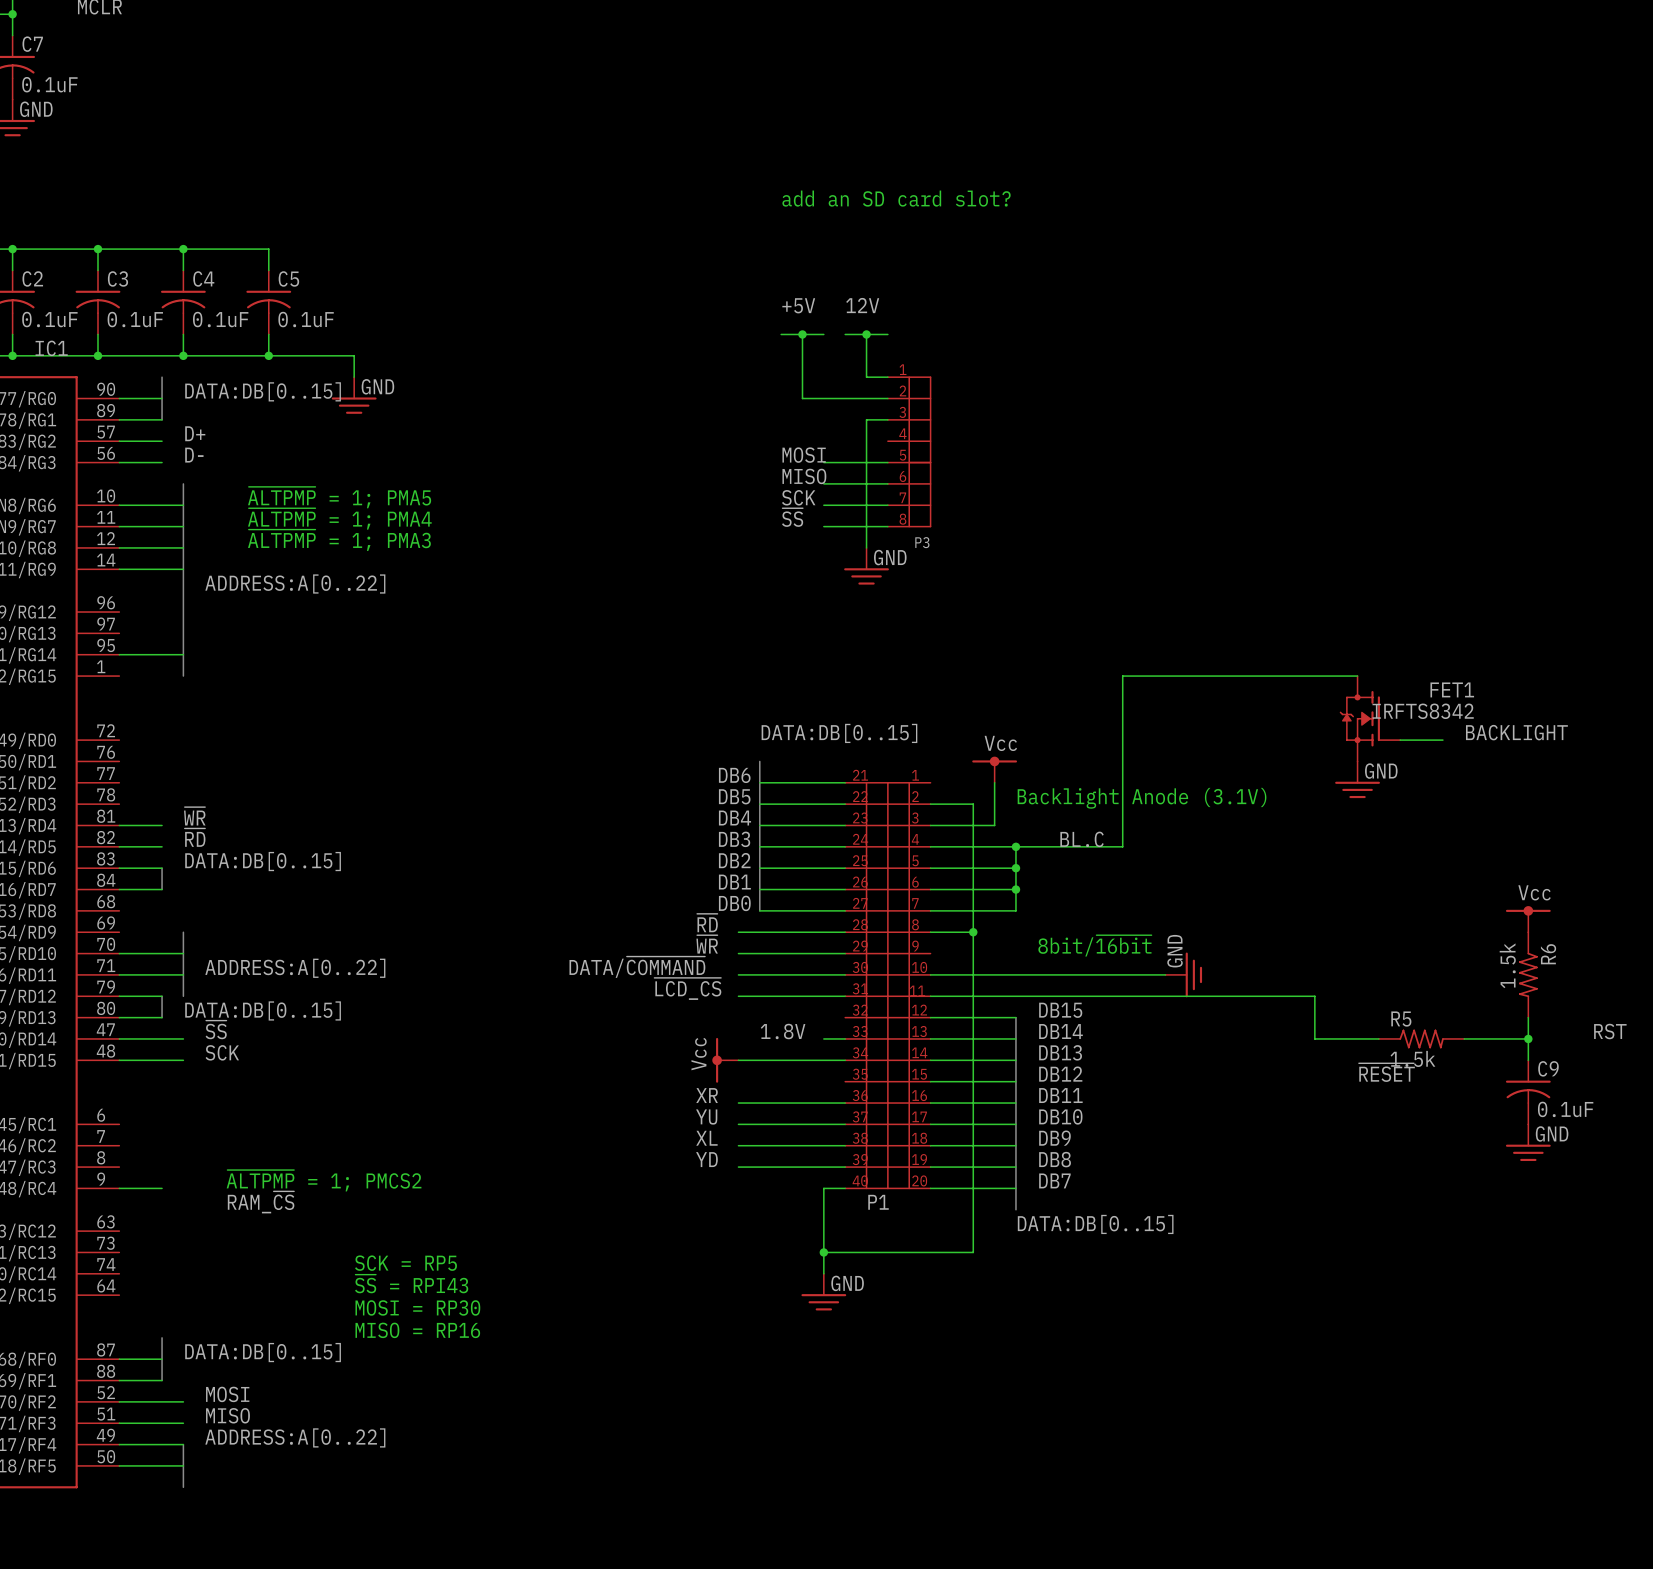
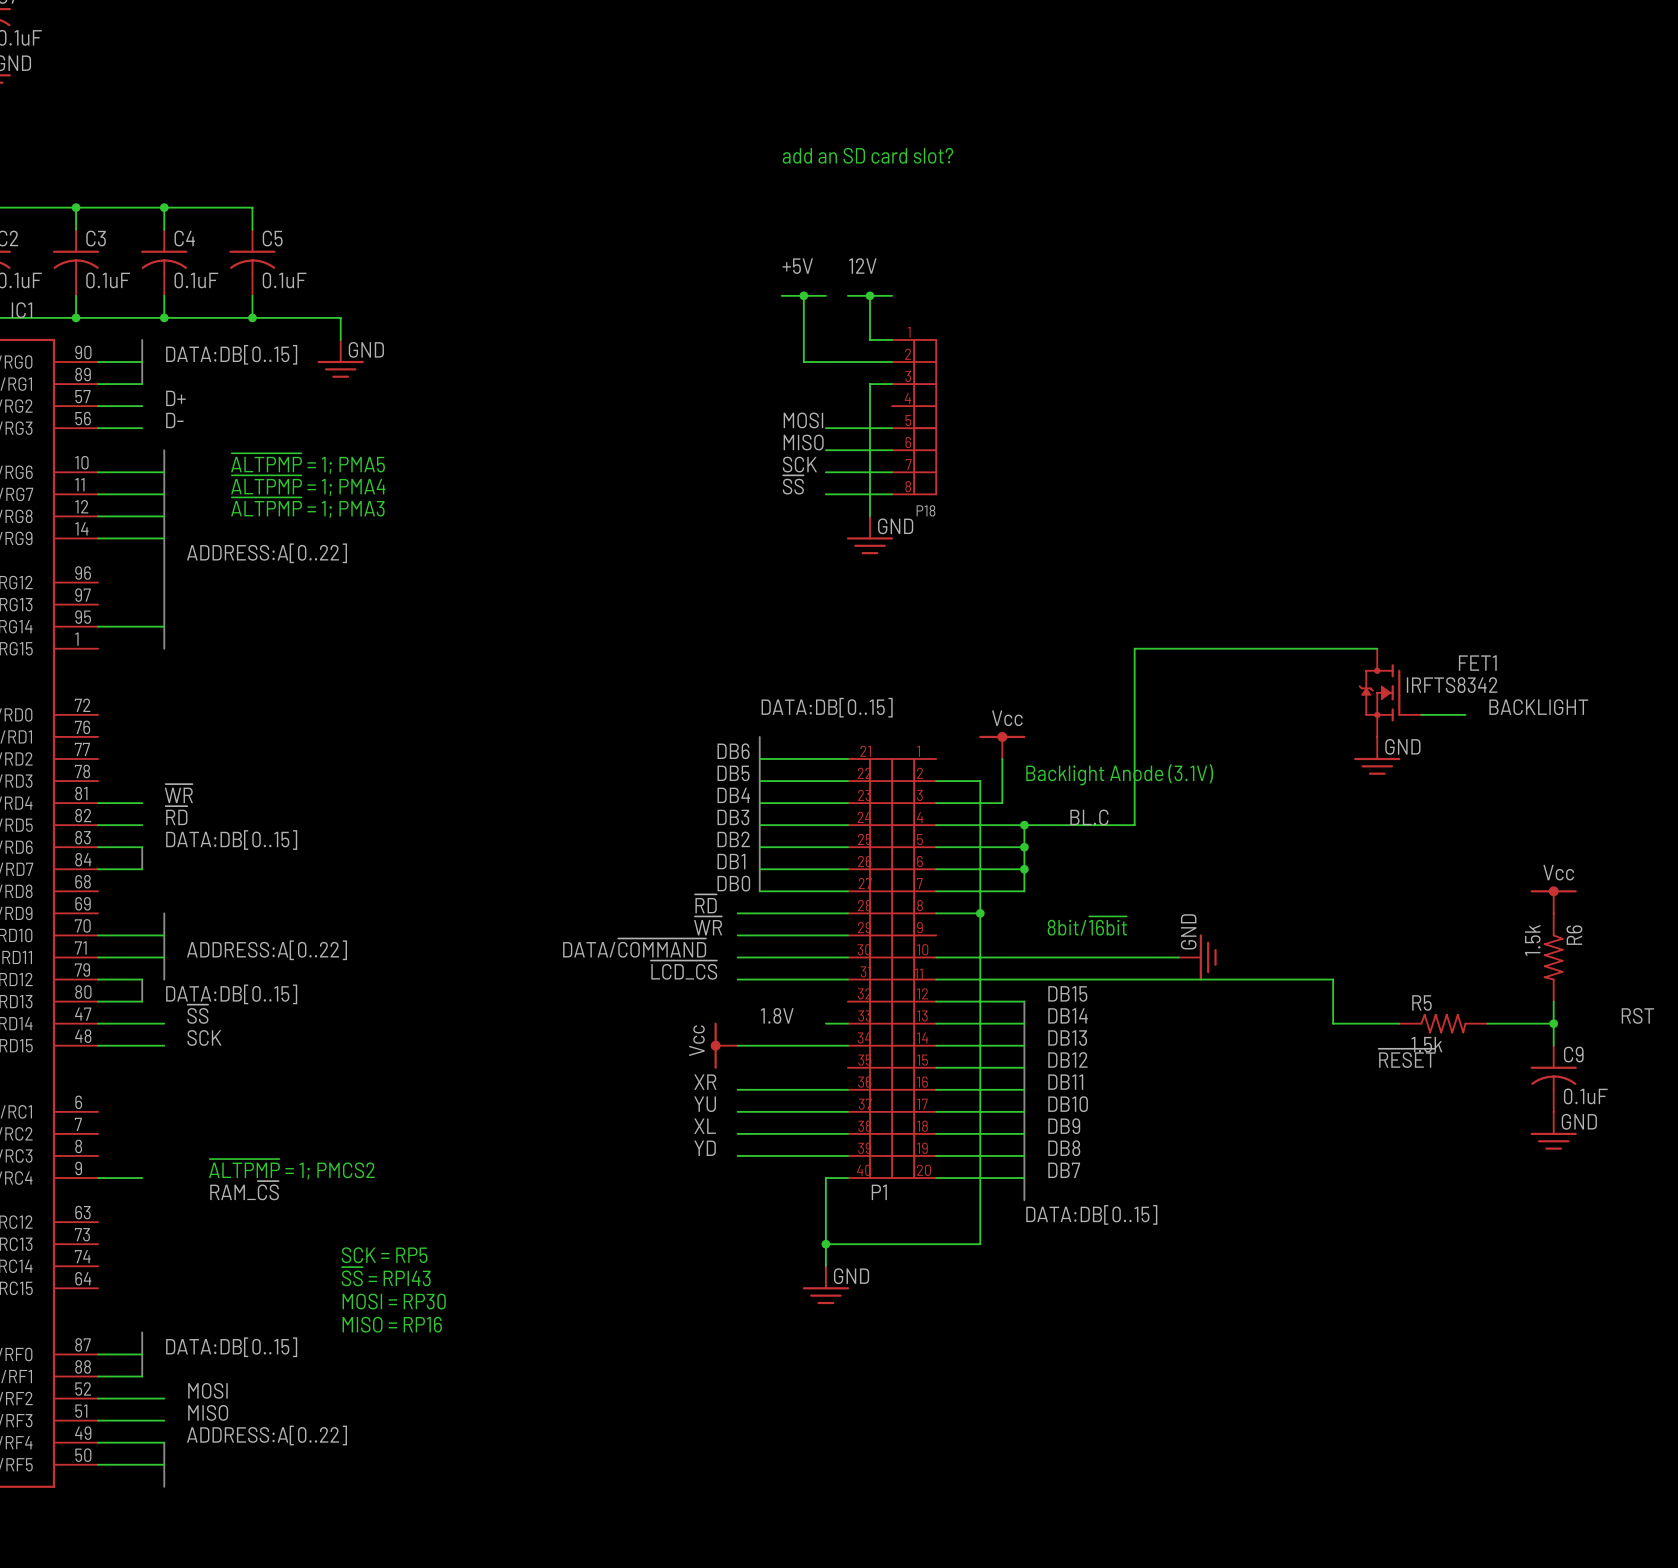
P3 name: P3 (922, 542) -> P18 (925, 510)

